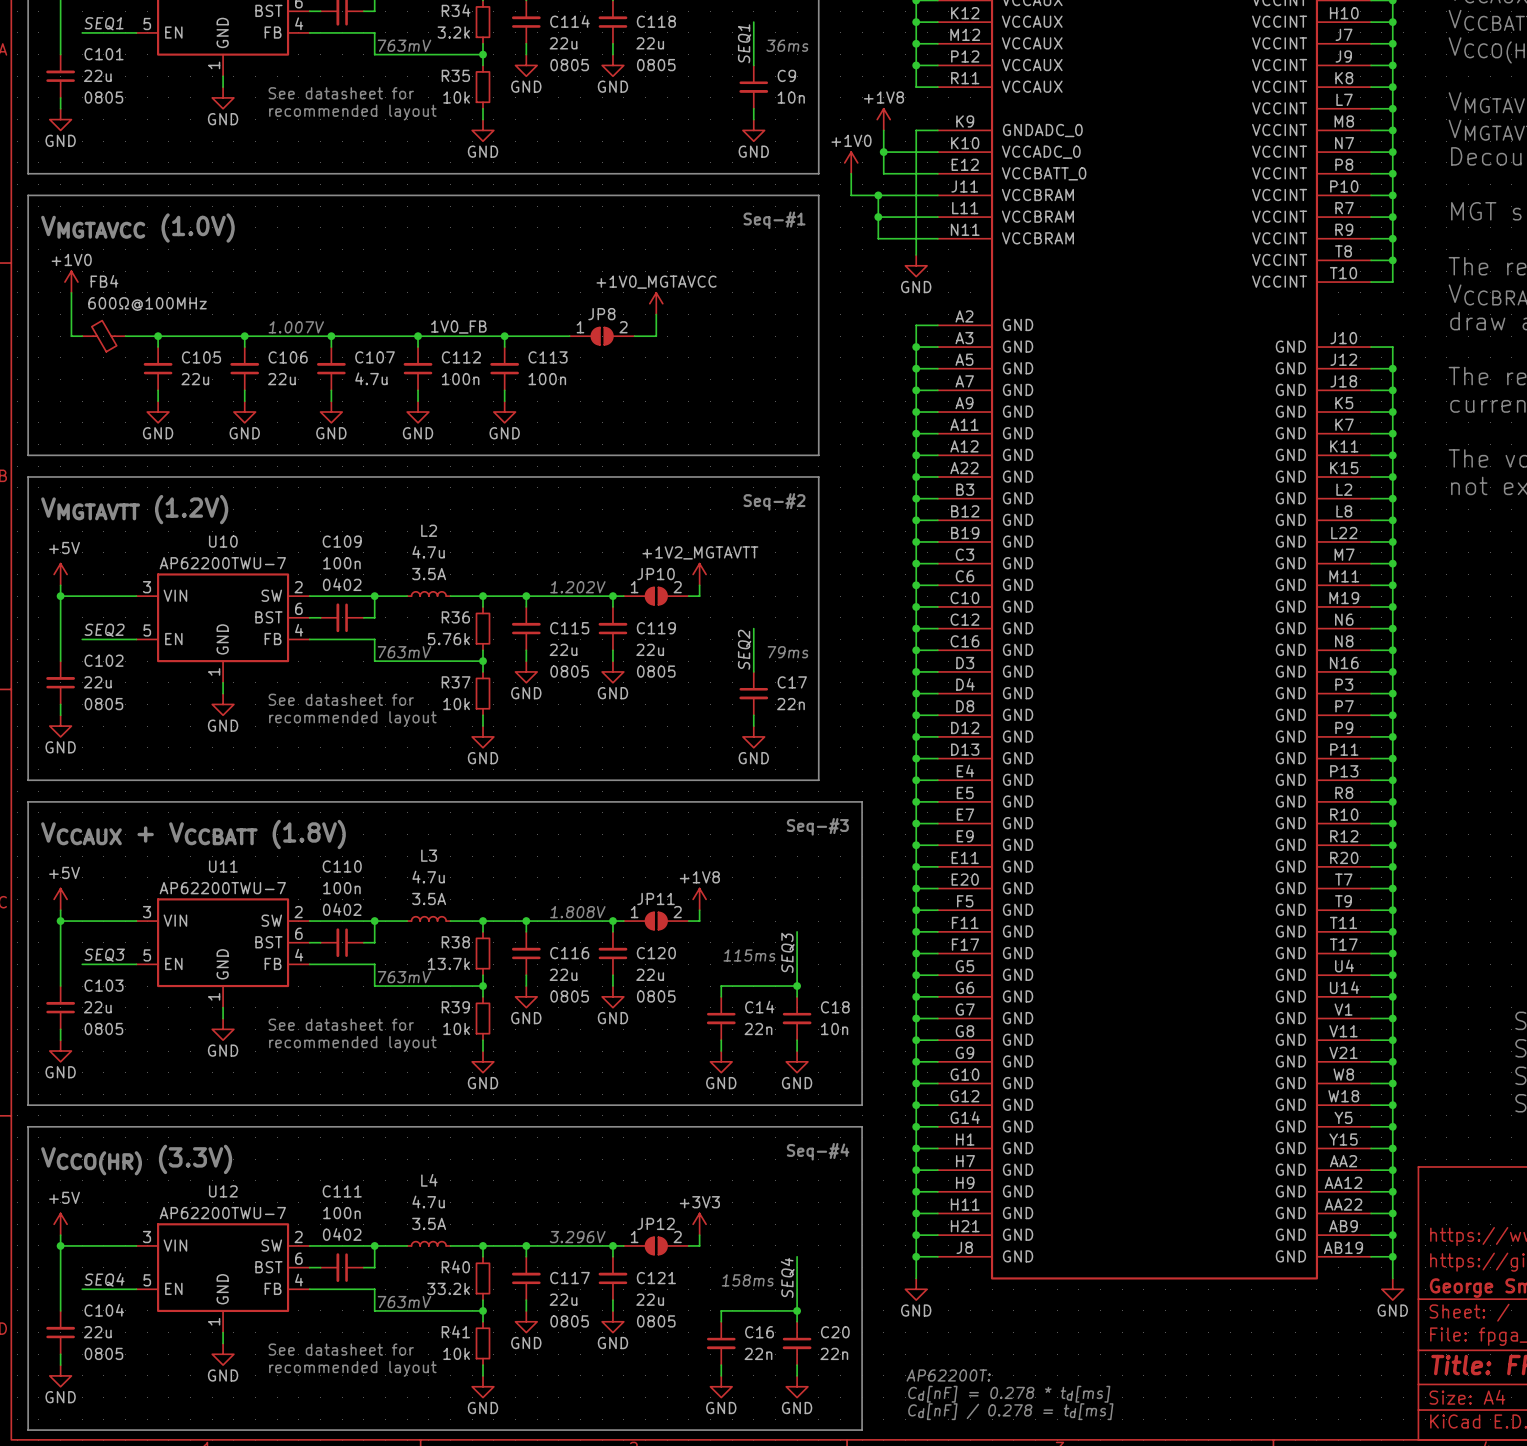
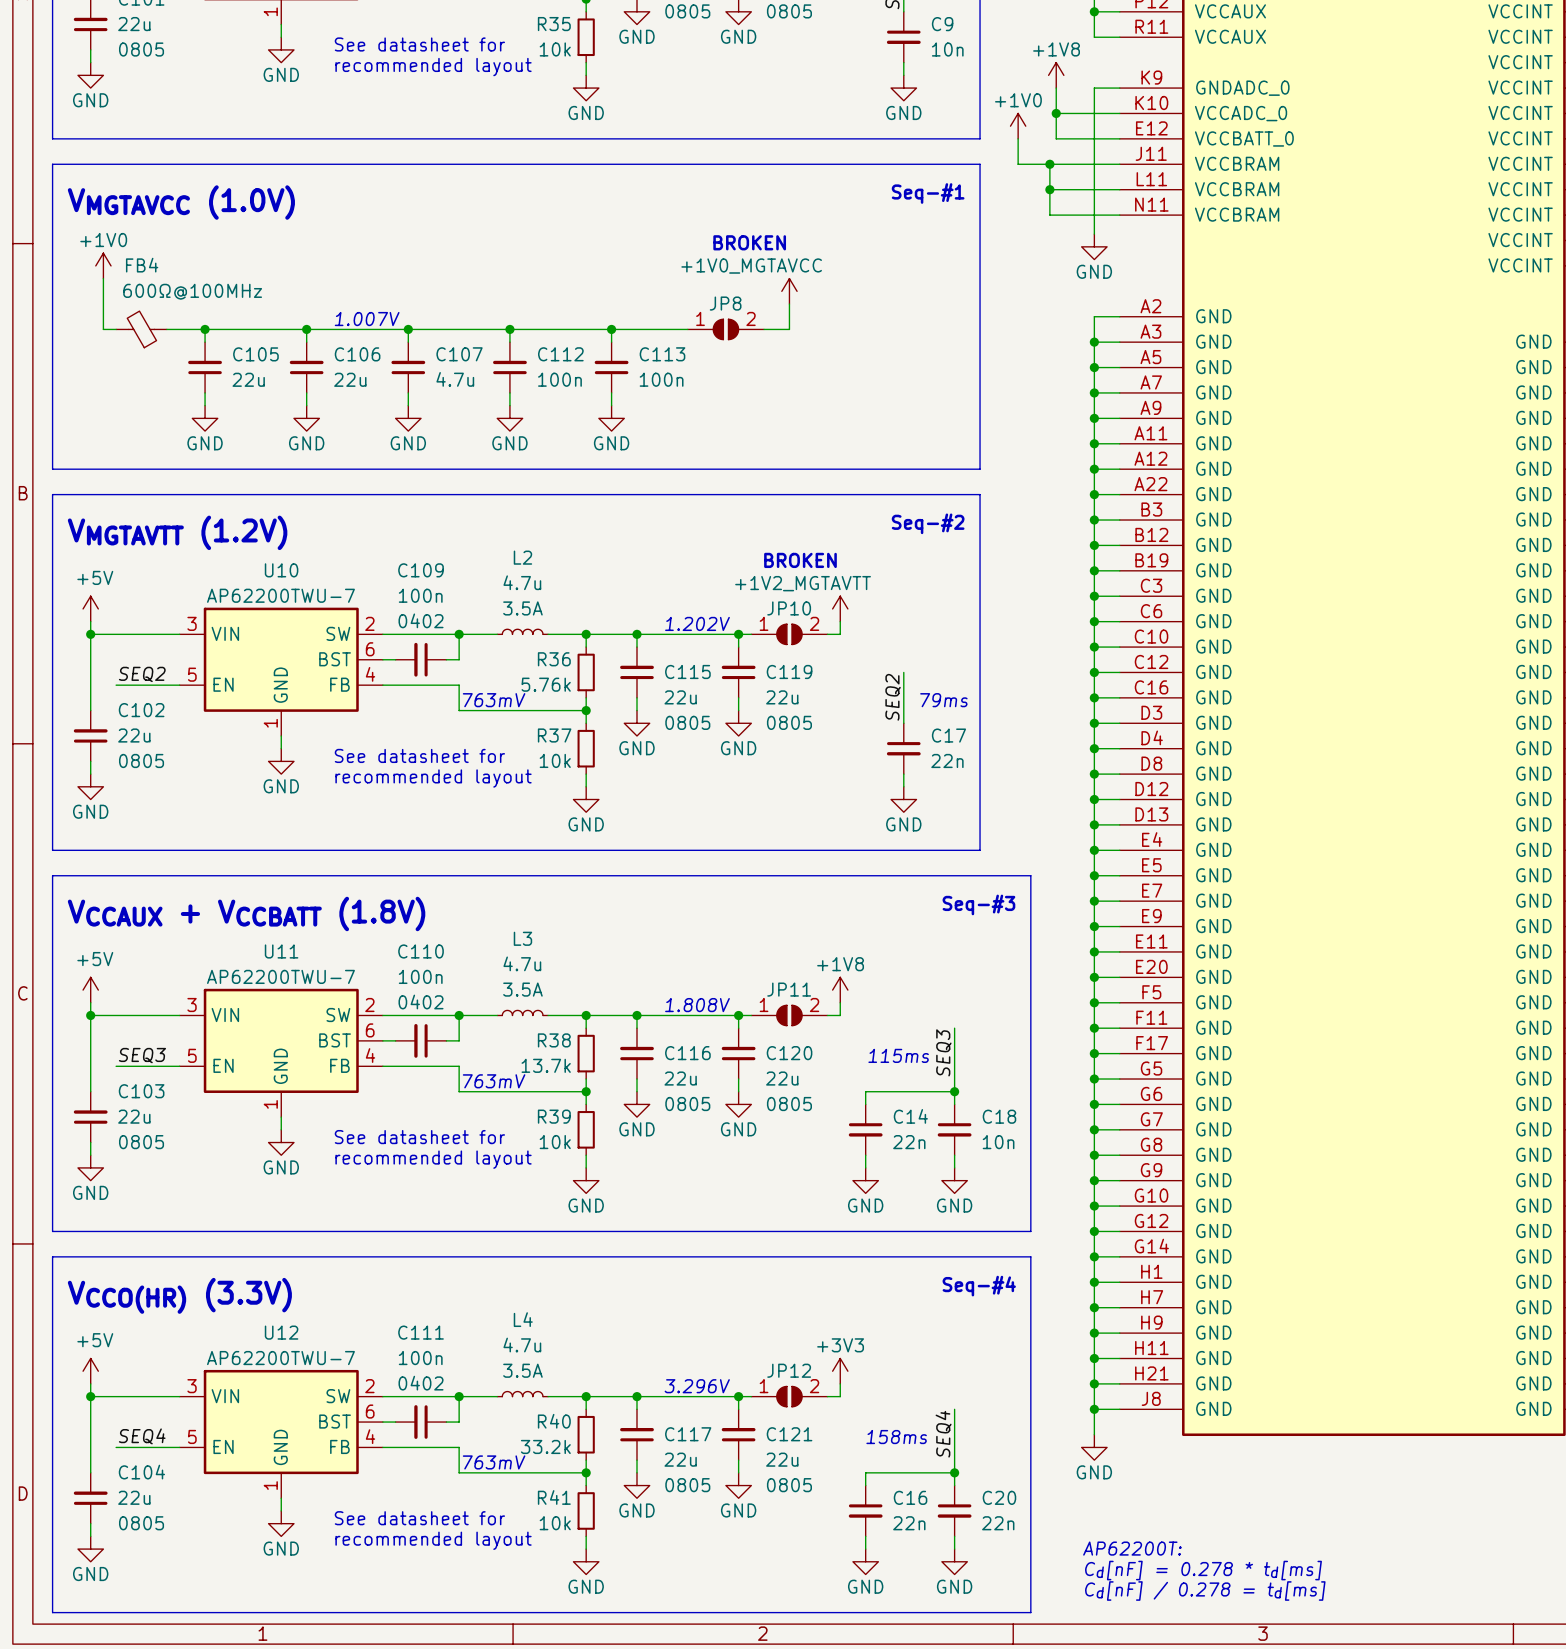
text: none -> BROKEN (749, 242)
power symbol text position: +1V0_MGTAVCC (656, 282) -> +1V0_MGTAVCC (751, 266)
label: 1V0_FB (458, 327) -> none
text: none -> BROKEN (800, 560)
power symbol text position: +1V2_MGTAVTT (700, 552) -> +1V2_MGTAVTT (803, 583)

